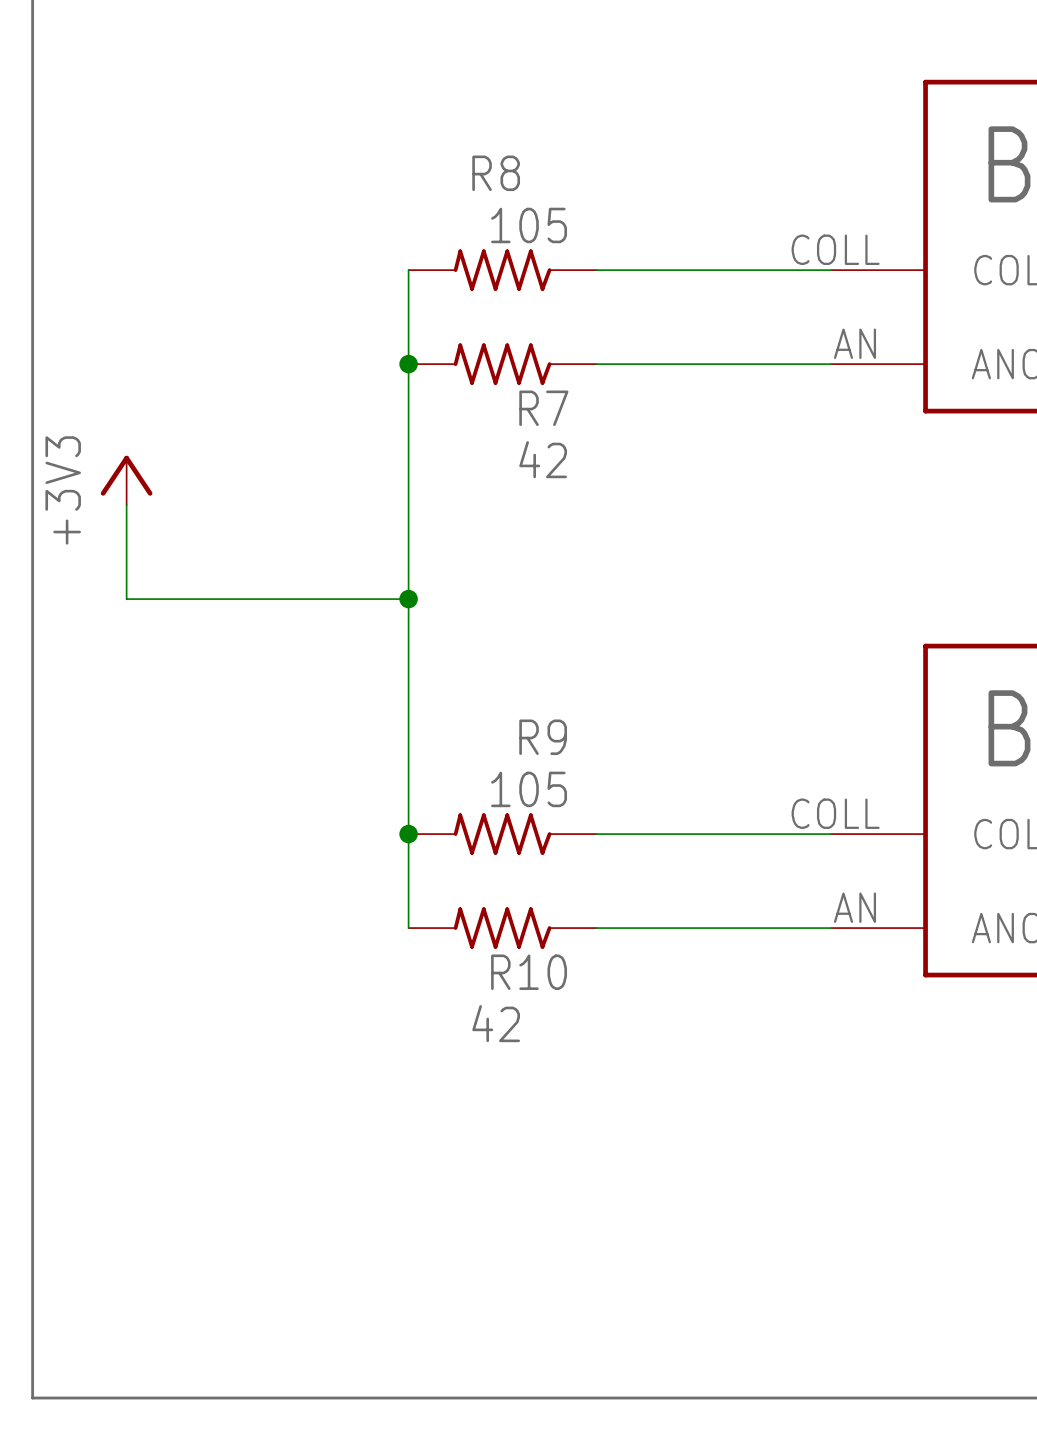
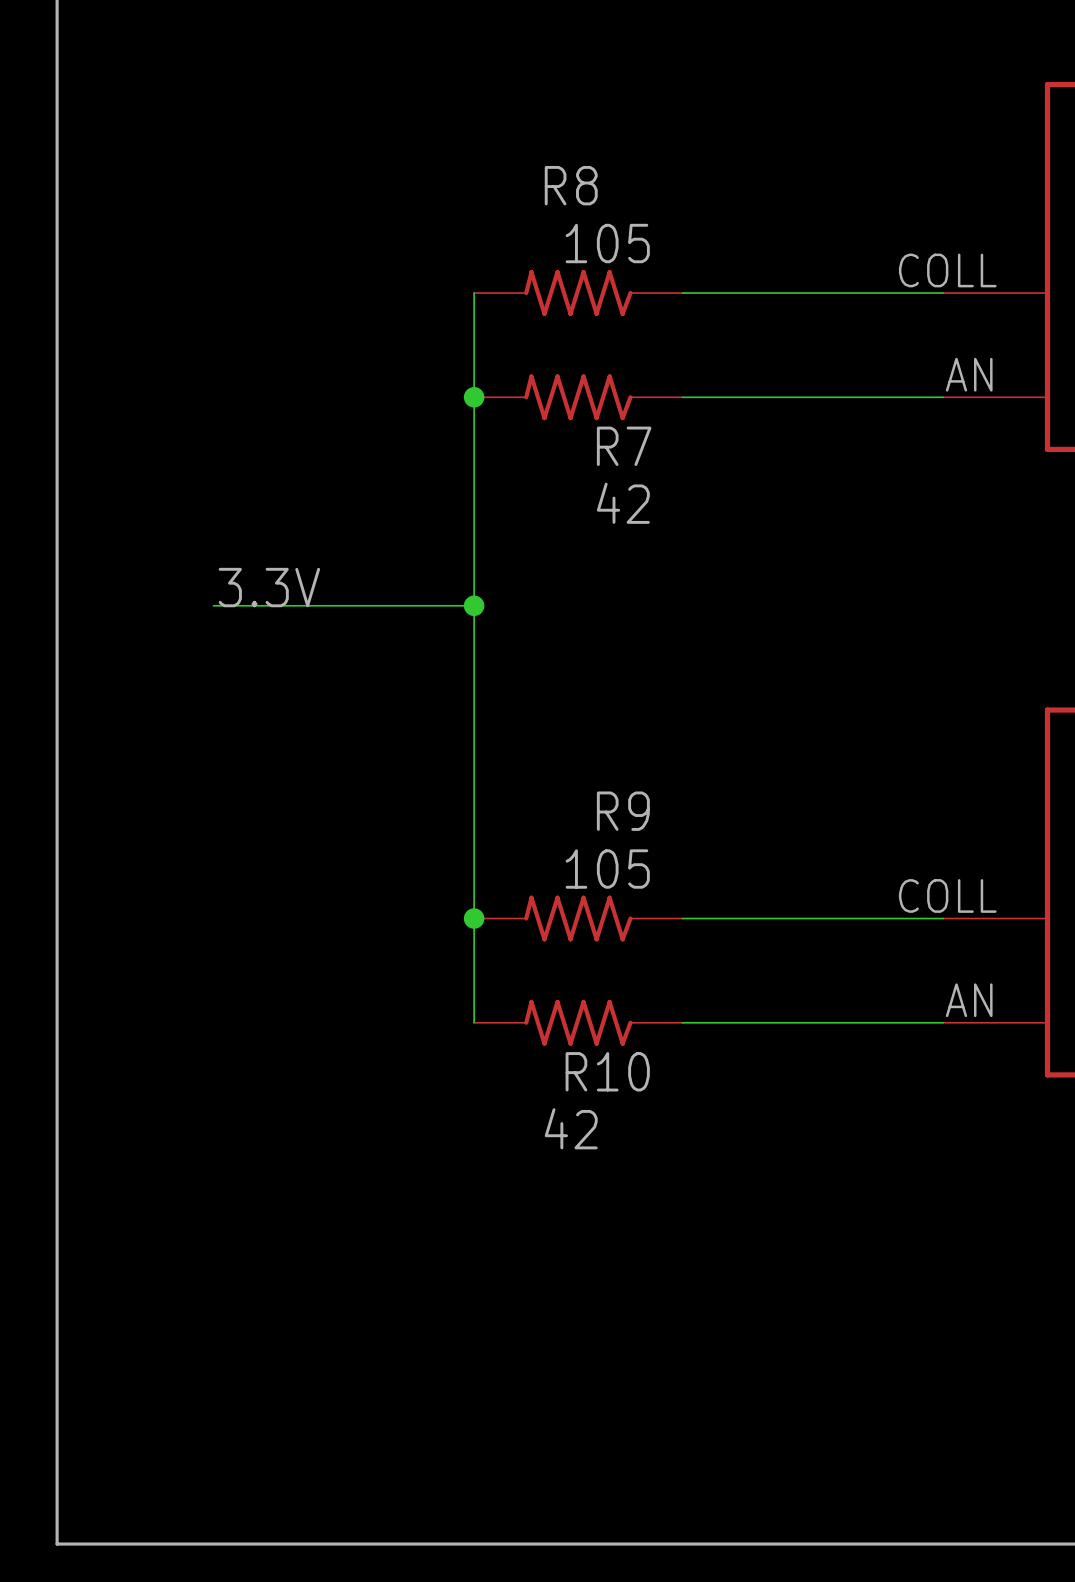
power symbol: +3V3 (126, 480) -> none
wire: (126, 505) (126, 599) (408, 599) -> none
label: none -> 3.3V (269, 587)
wire: none -> (213, 605) (474, 605)
junction position: (408, 599) -> (474, 605)

